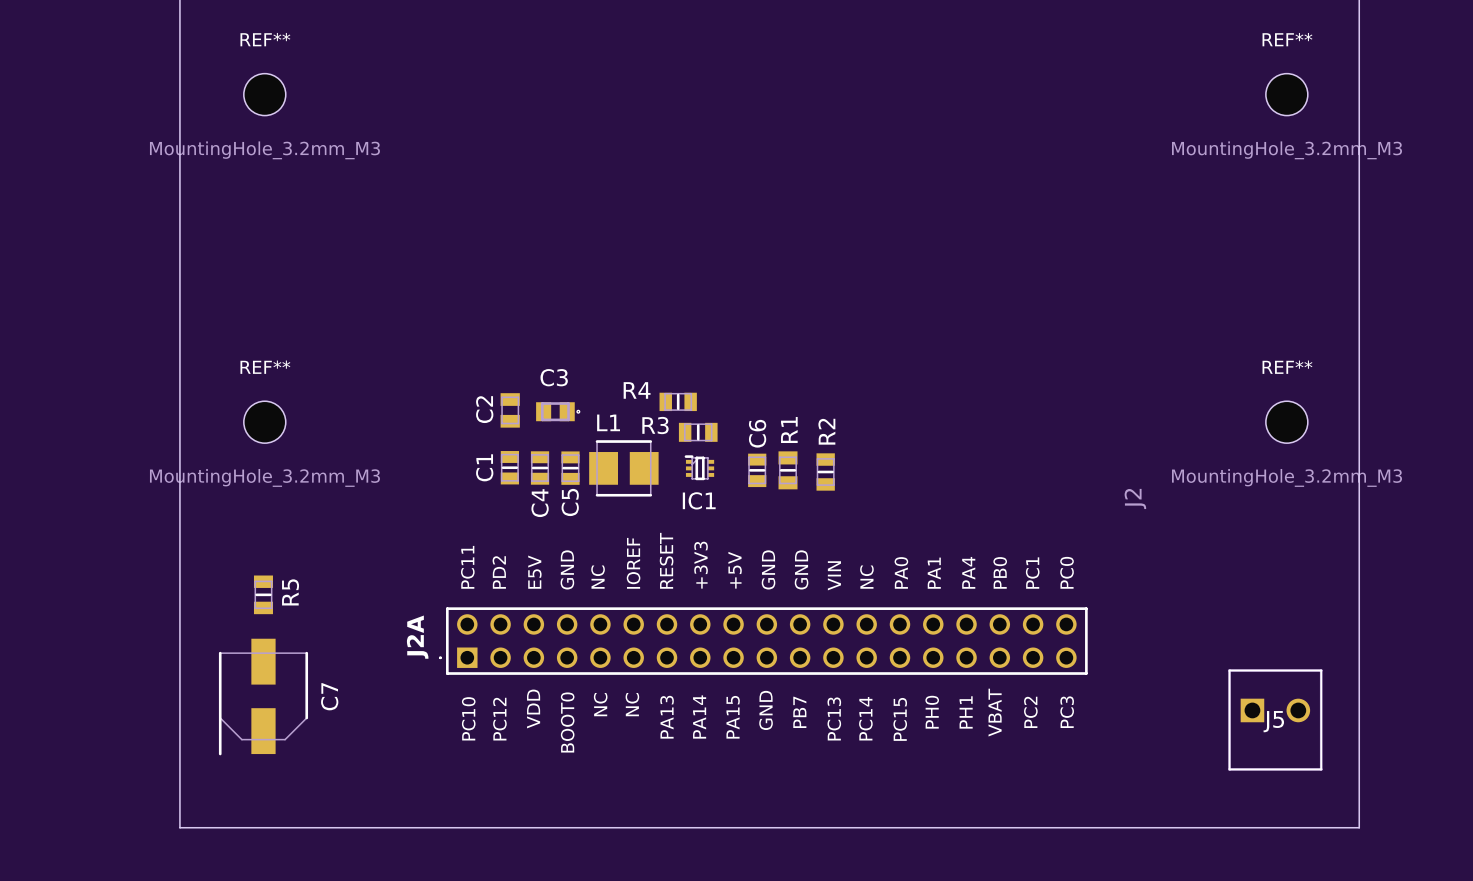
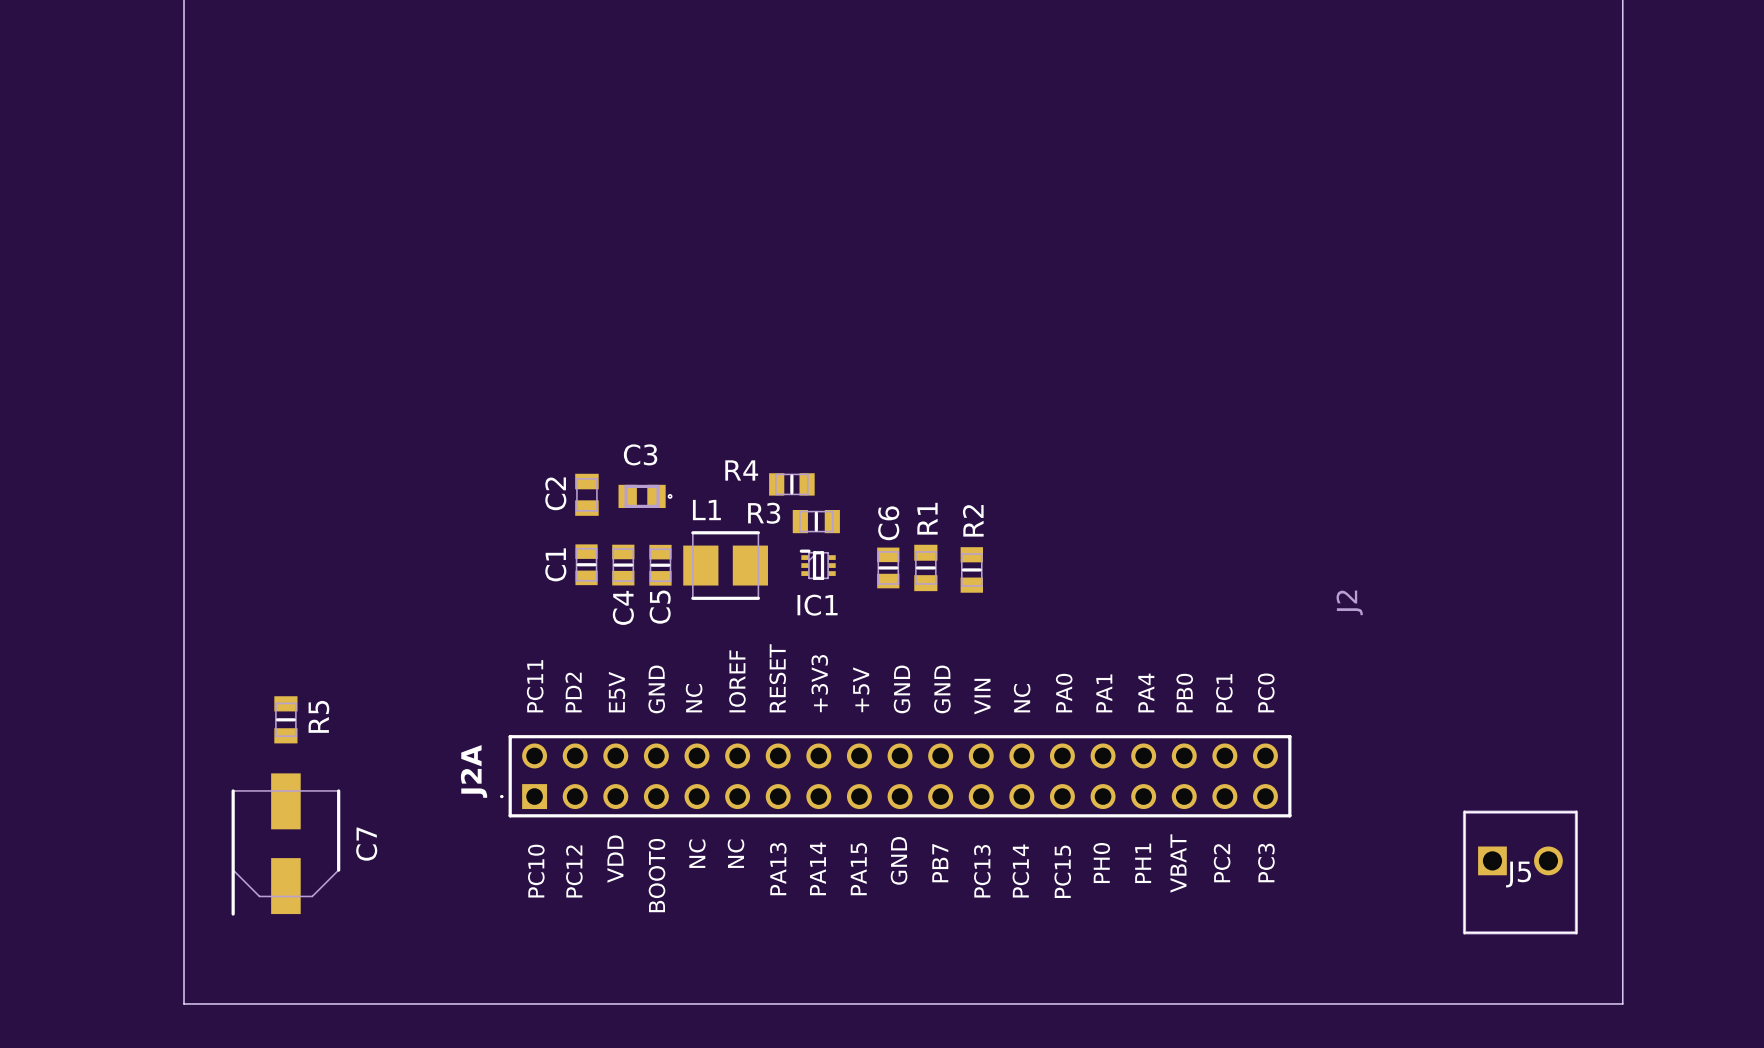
REF**: MountingHole_3.2mm_M3 (264, 94) -> none
REF**: MountingHole_3.2mm_M3 (1286, 94) -> none
REF**: MountingHole_3.2mm_M3 (264, 422) -> none
REF**: MountingHole_3.2mm_M3 (1286, 422) -> none

